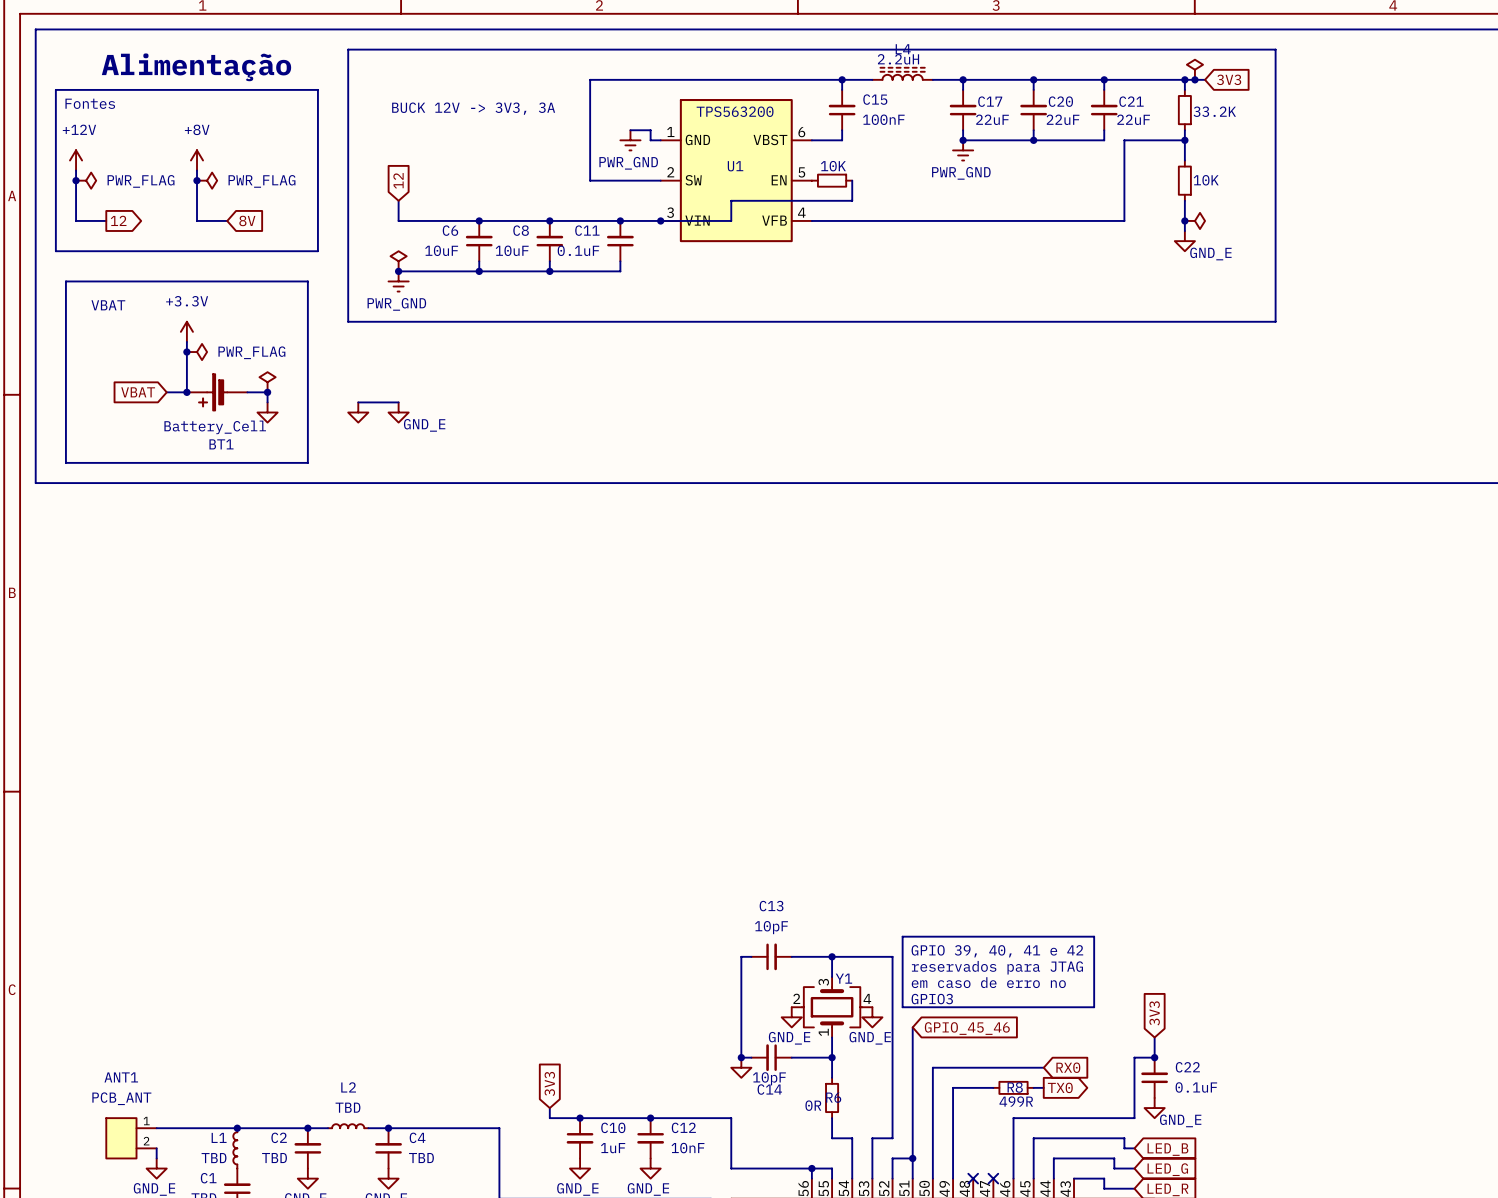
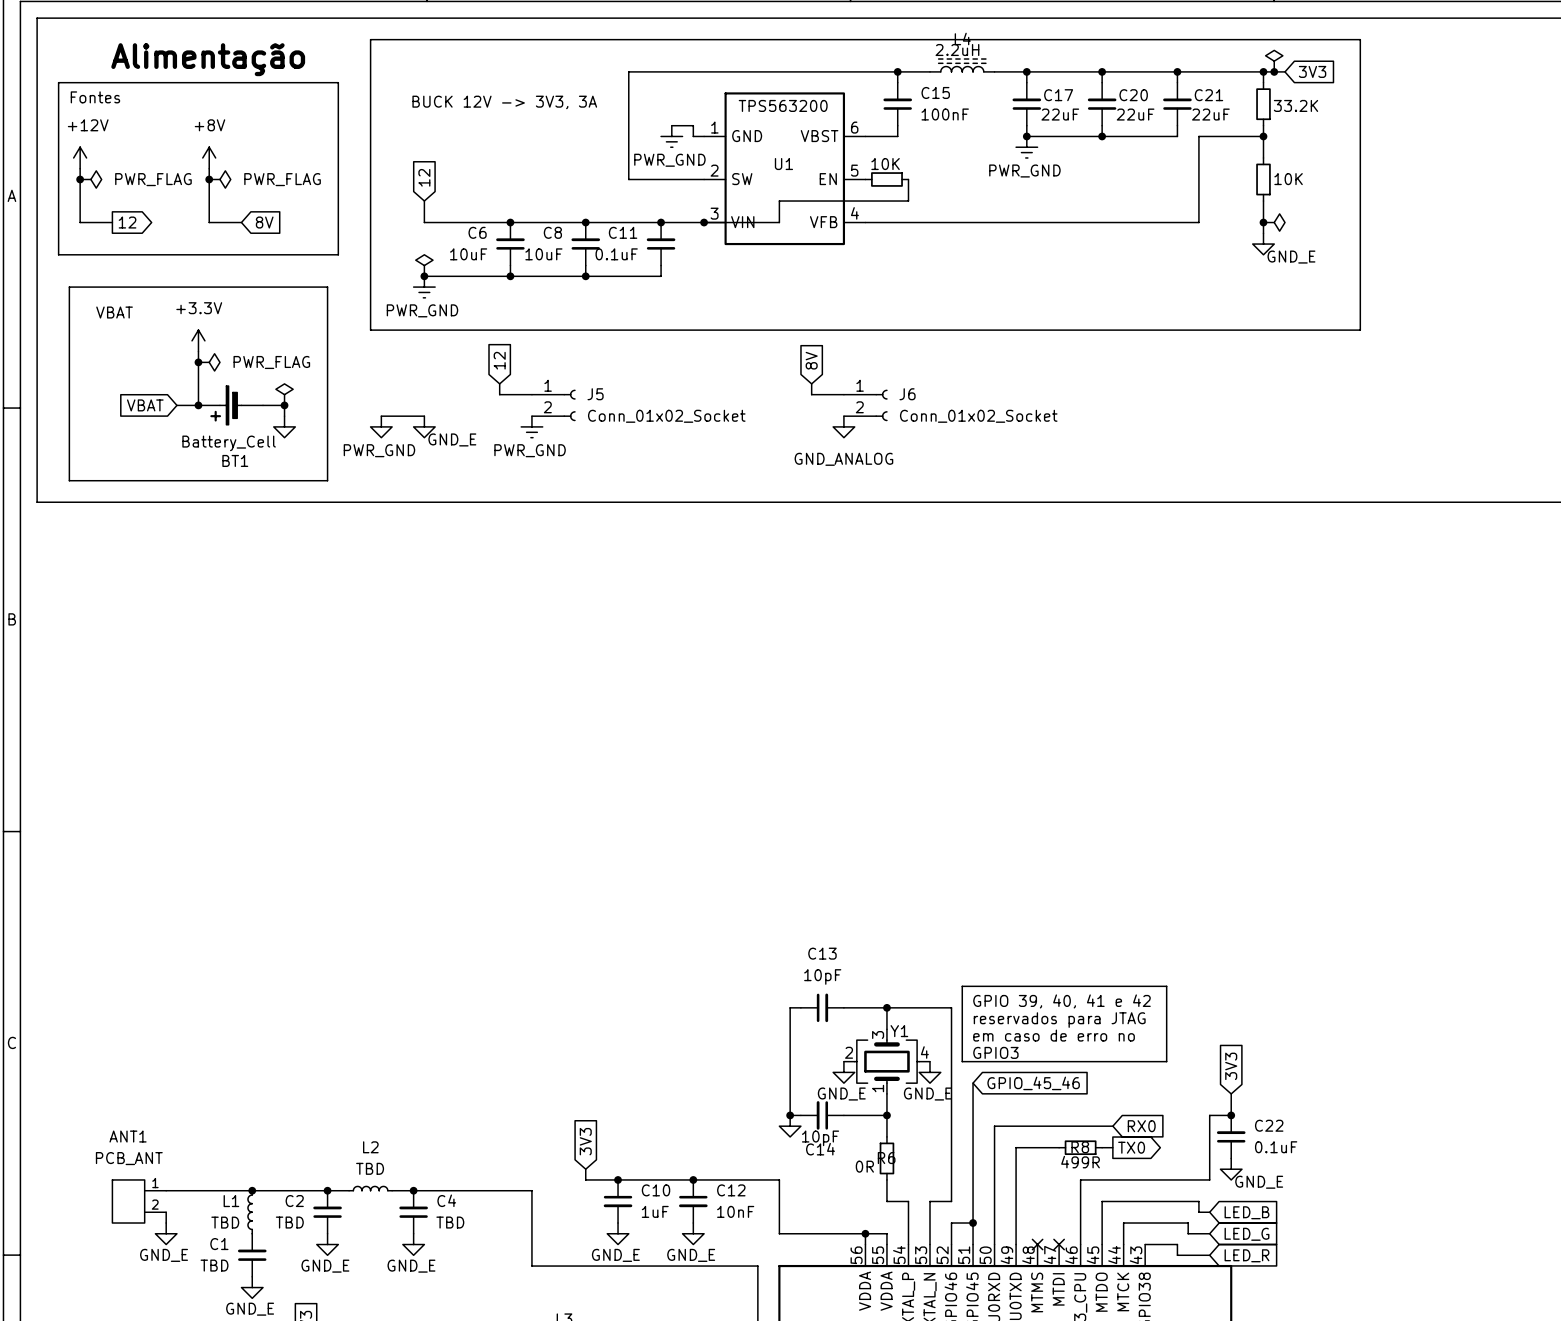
global label: none -> 12 (499, 360)
global label: none -> 8V (811, 360)
wire: none -> (499, 383) (499, 394) (531, 394)
wire: none -> (811, 383) (811, 394) (843, 394)
J5: none -> Conn_01x02_Socket (553, 405)
J6: none -> Conn_01x02_Socket (865, 405)
power symbol: none -> PWR_GND (531, 426)
power symbol: none -> GND_ANALOG (843, 426)
power symbol text: none -> PWR_GND (379, 450)

